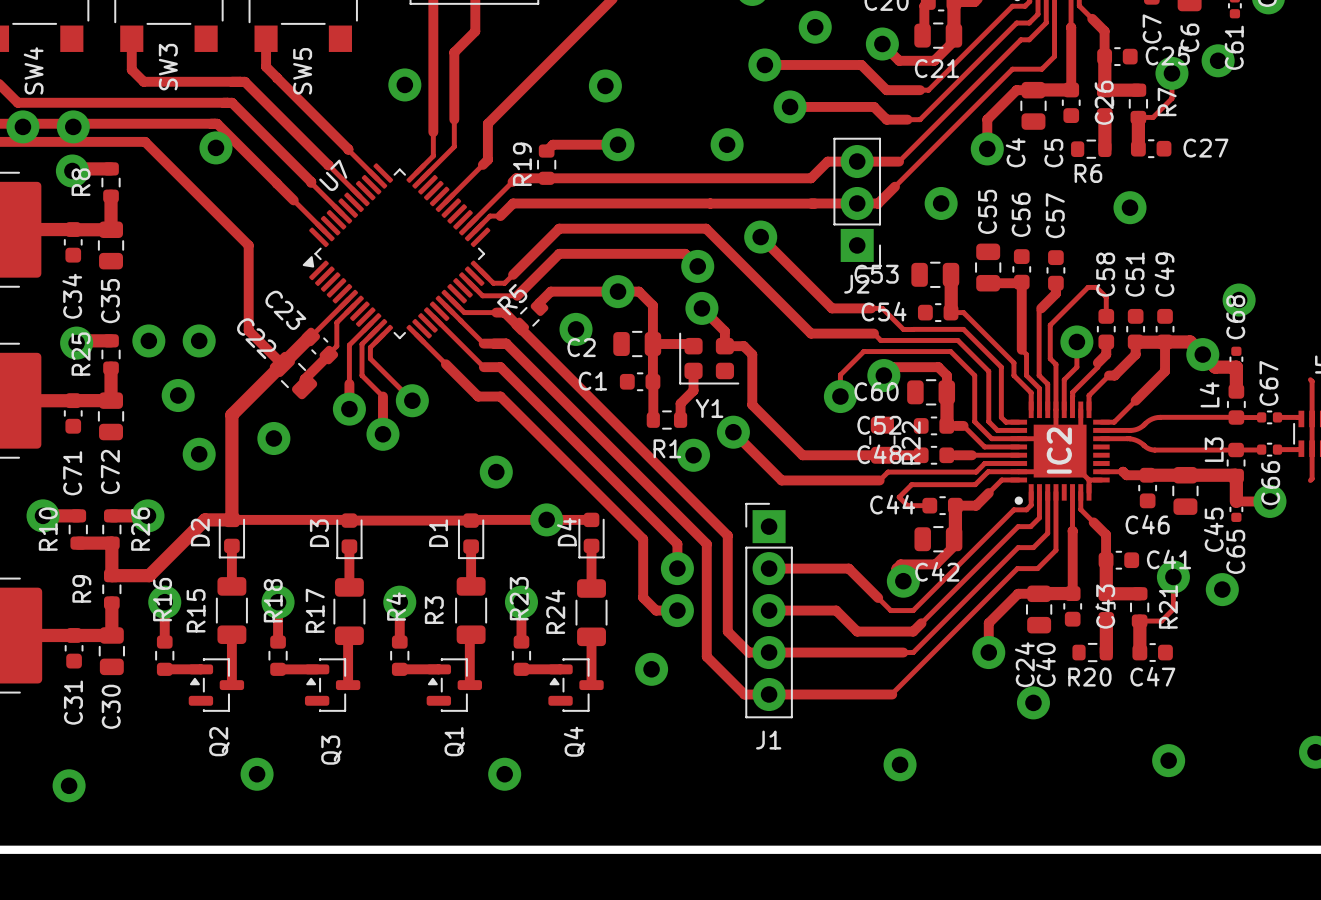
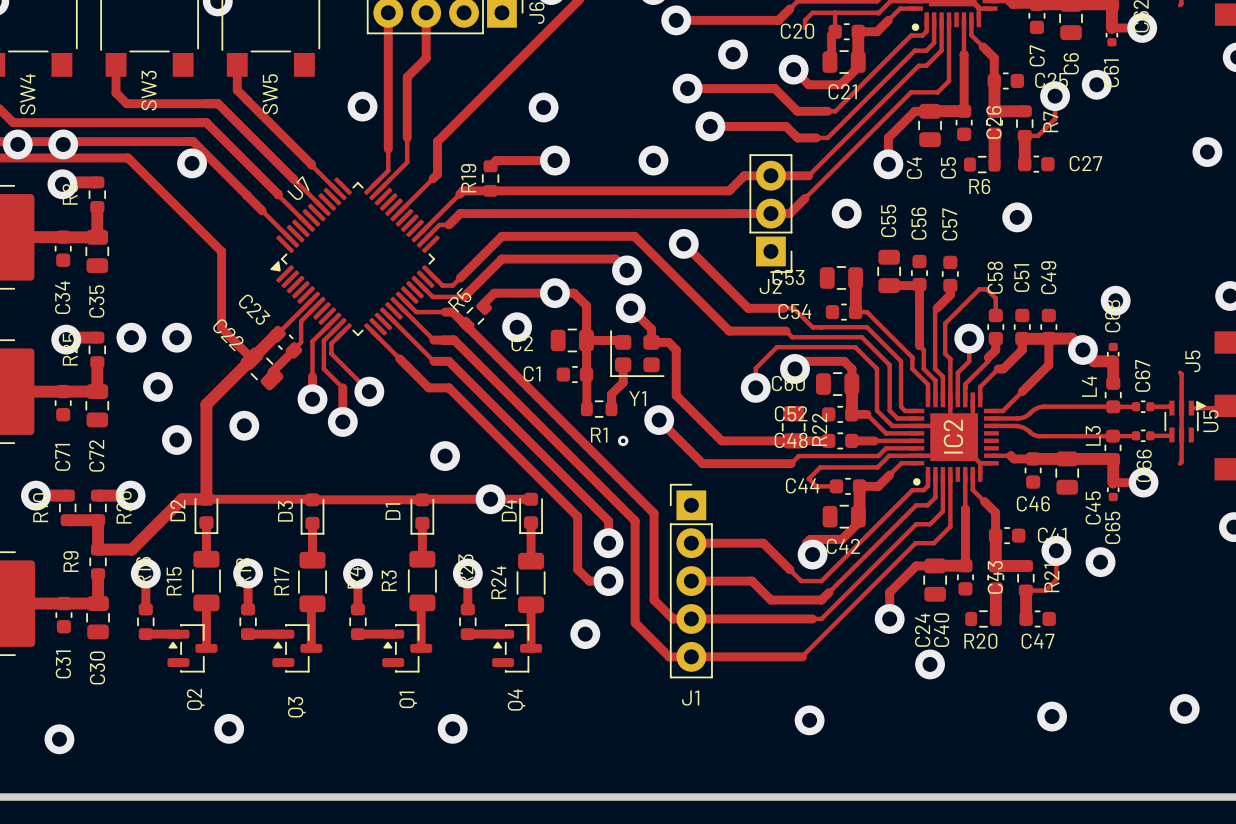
via size: [677, 438, 711, 472] -> [617, 435, 629, 447]

